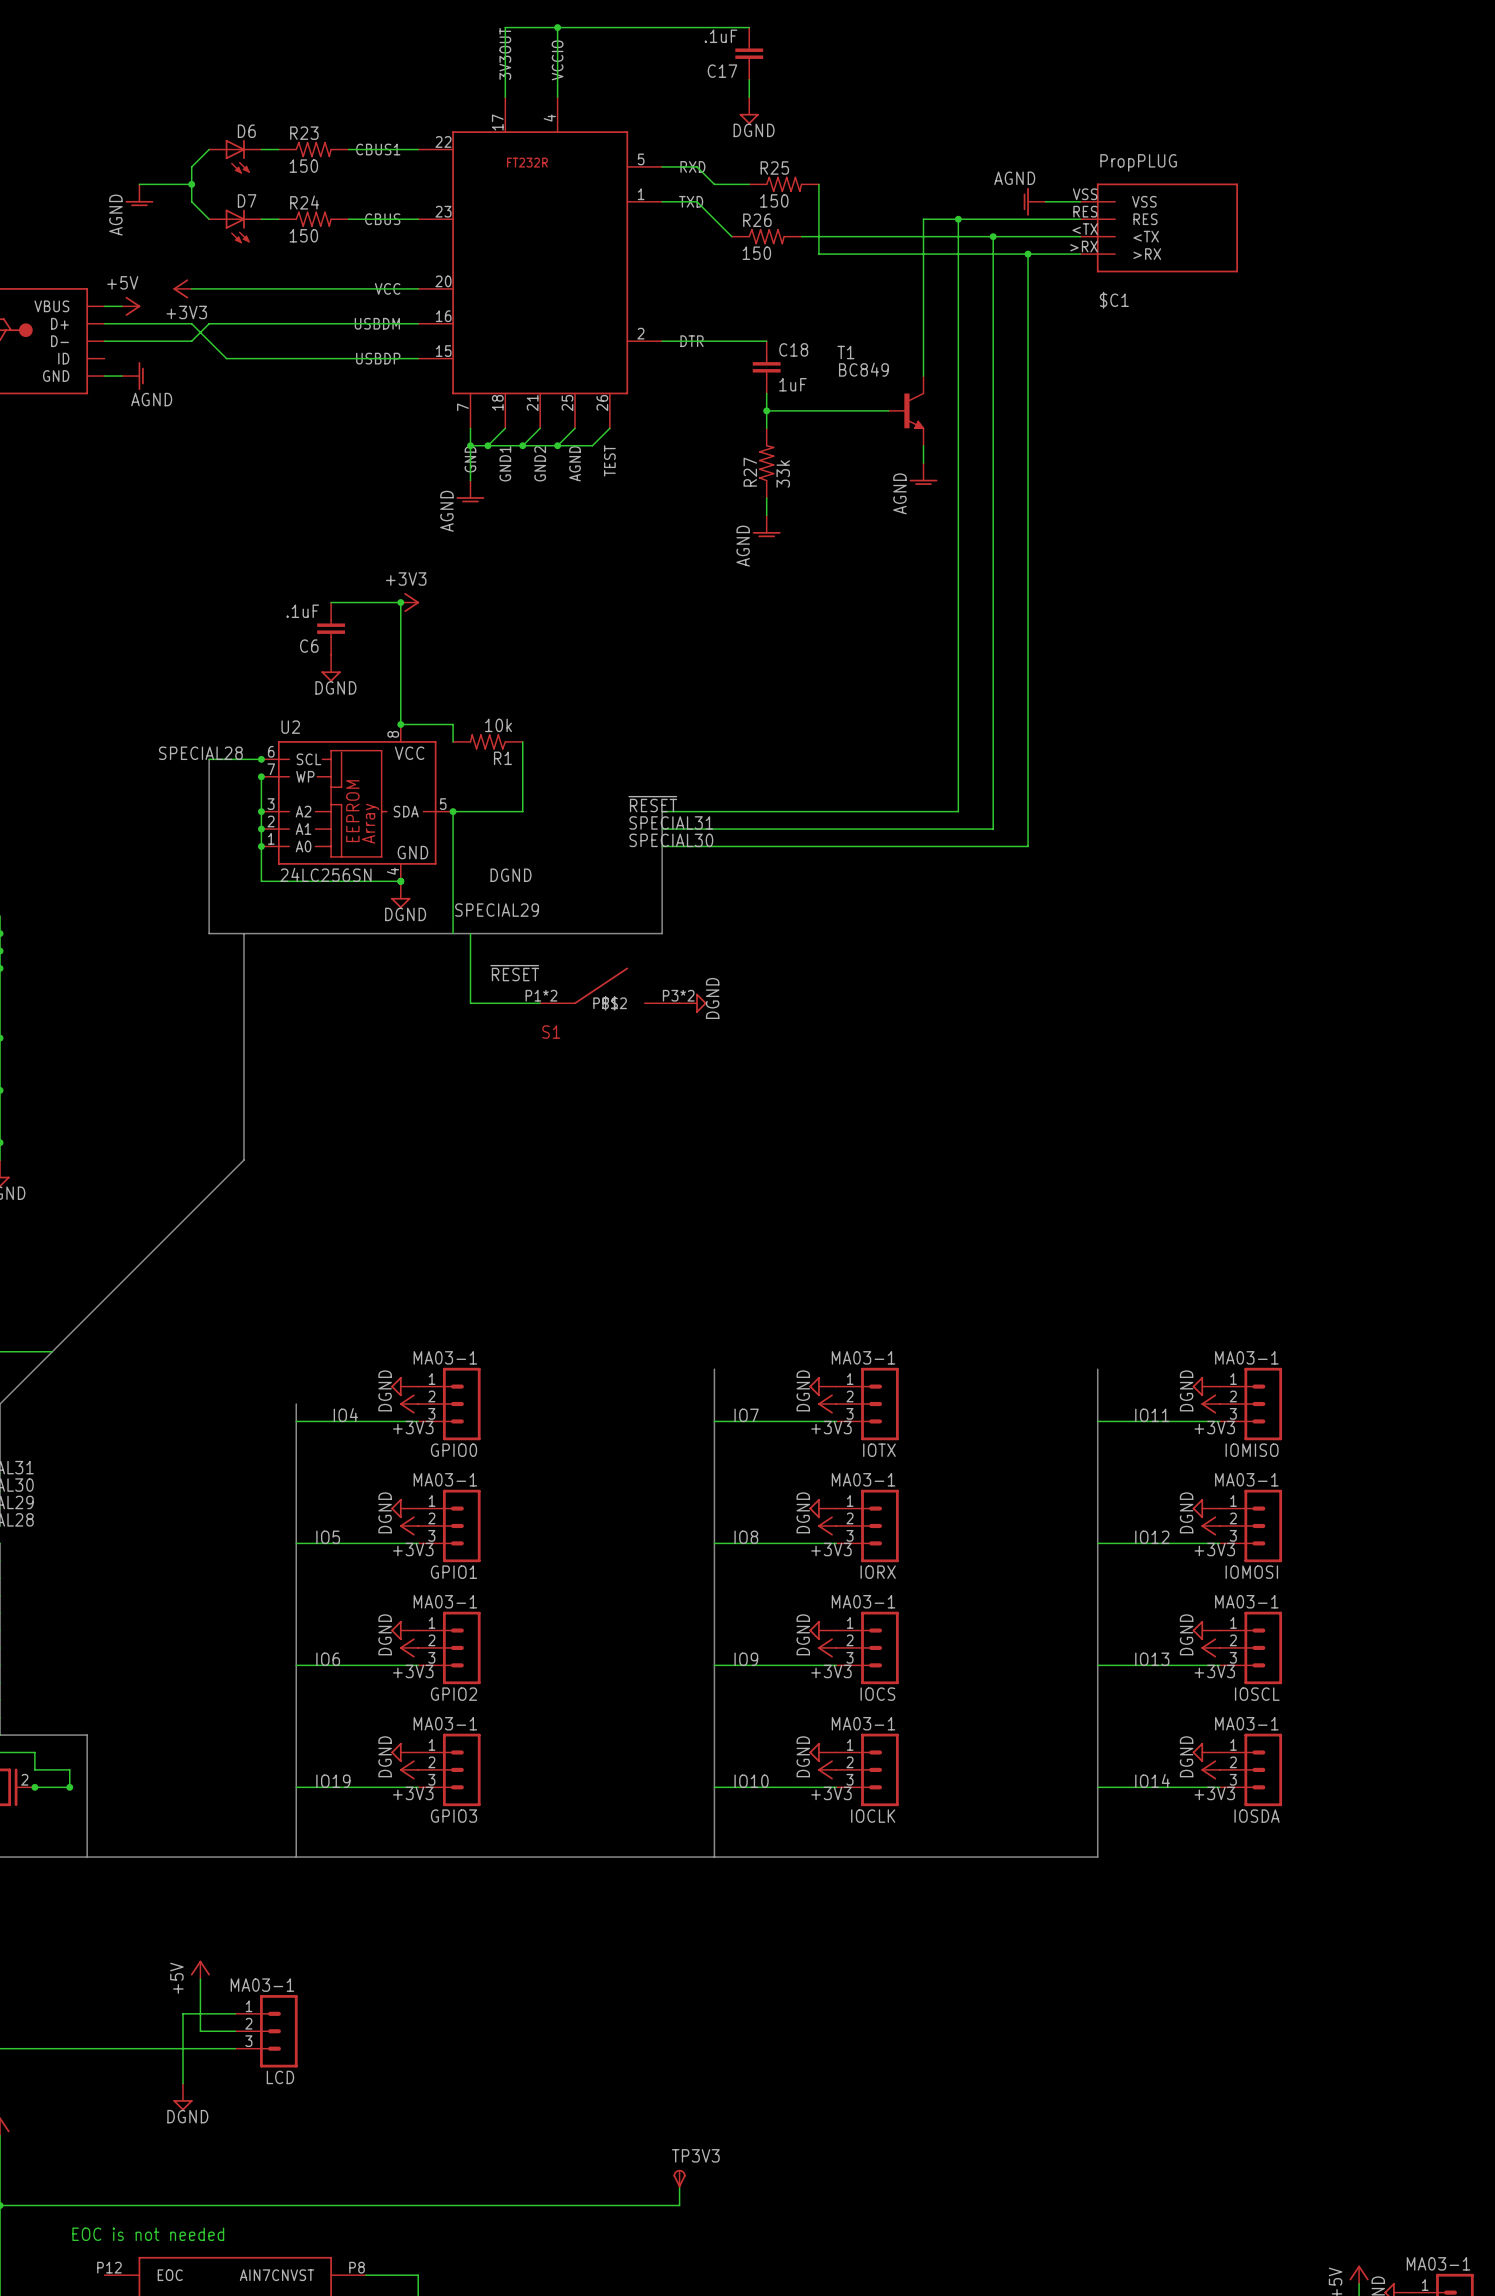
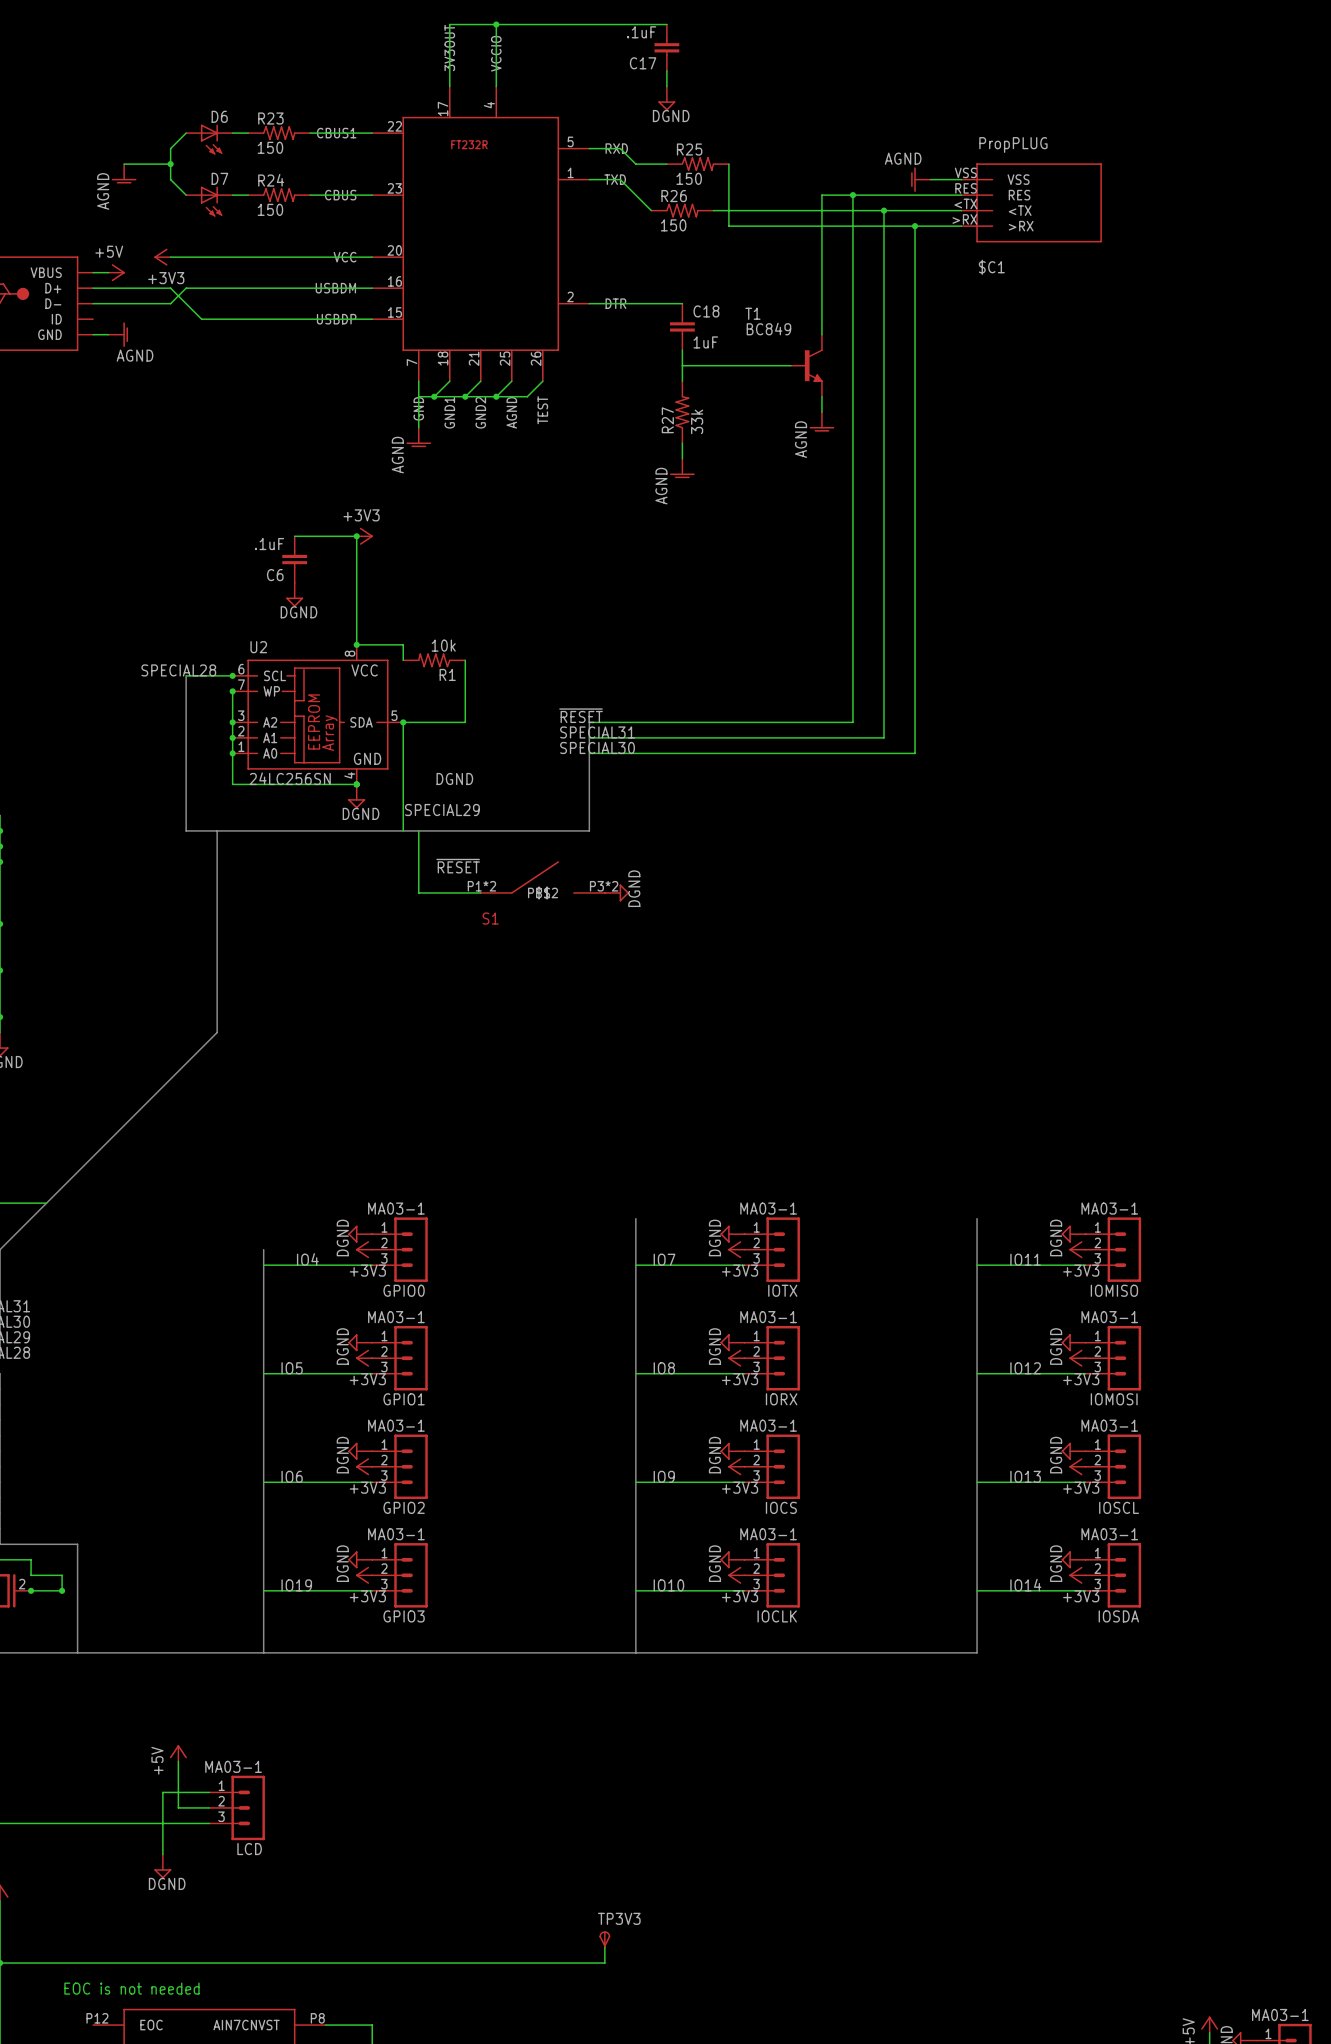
junction: (766, 410) -> none
junction: (470, 445) -> none

